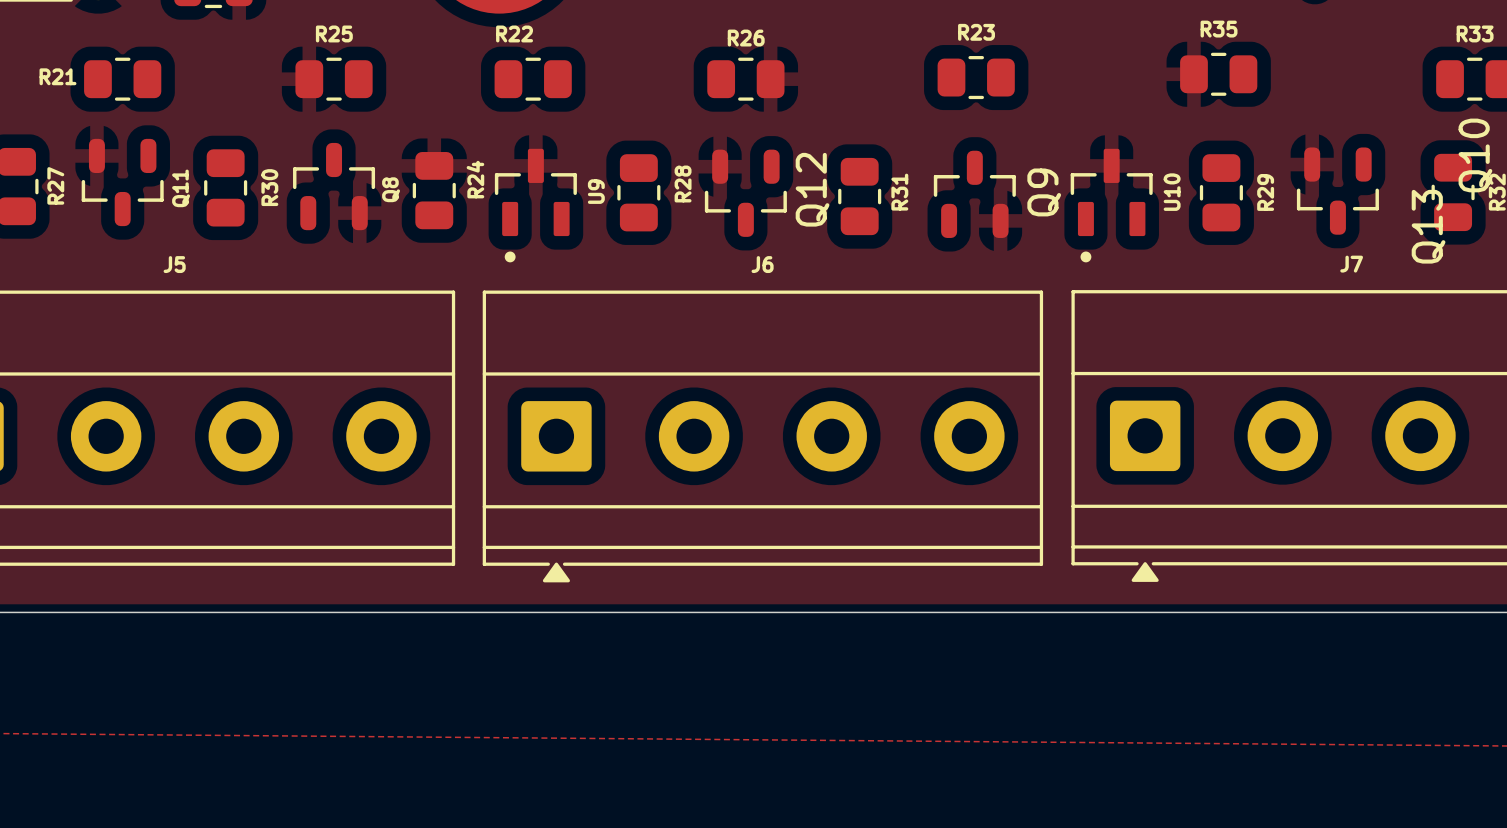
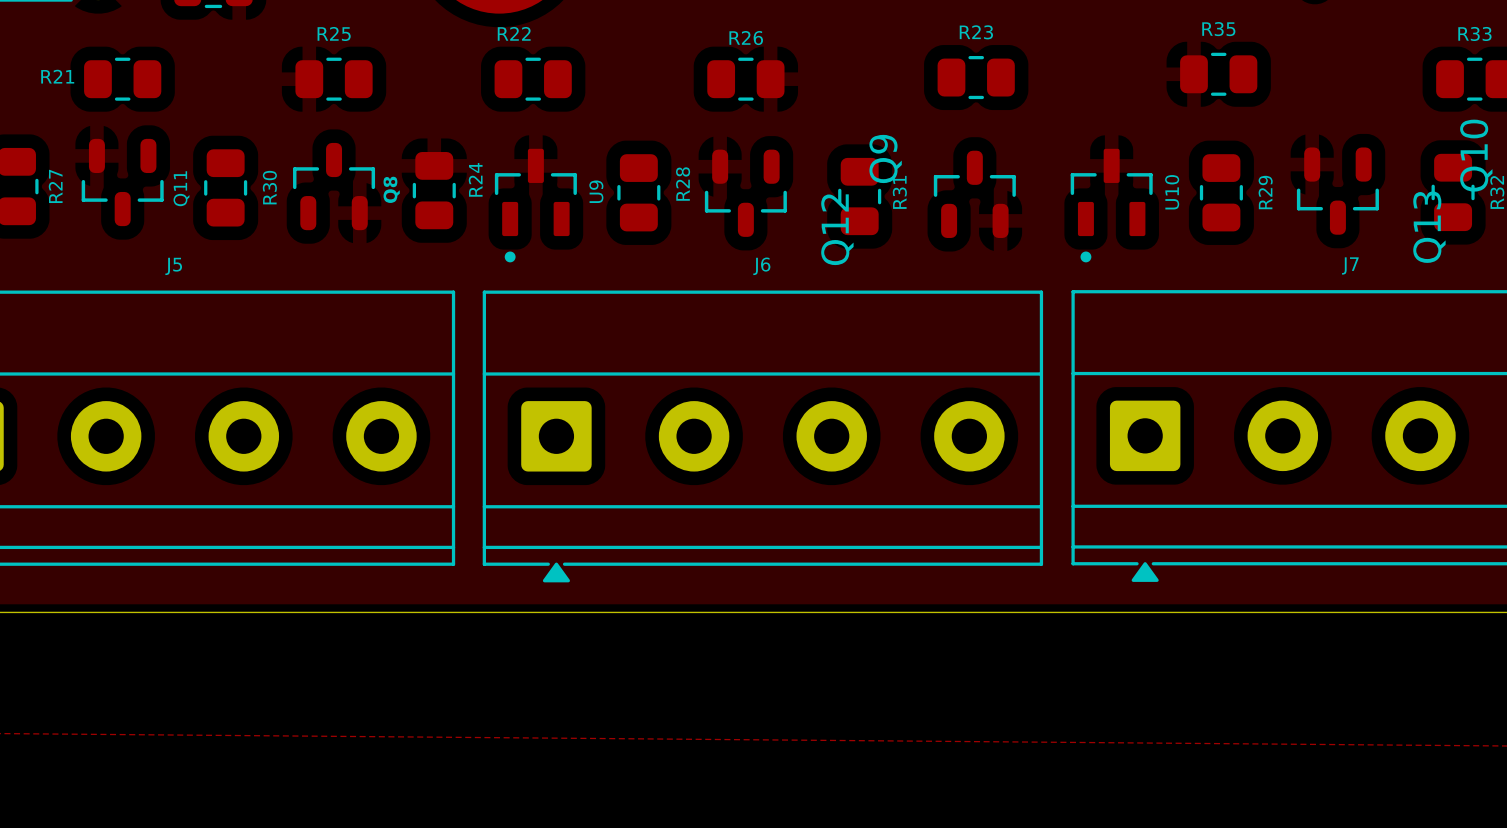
Q12 name position: Q12 (812, 189) -> Q12 (837, 229)
Q9 name position: Q9 (1044, 192) -> Q9 (885, 158)

